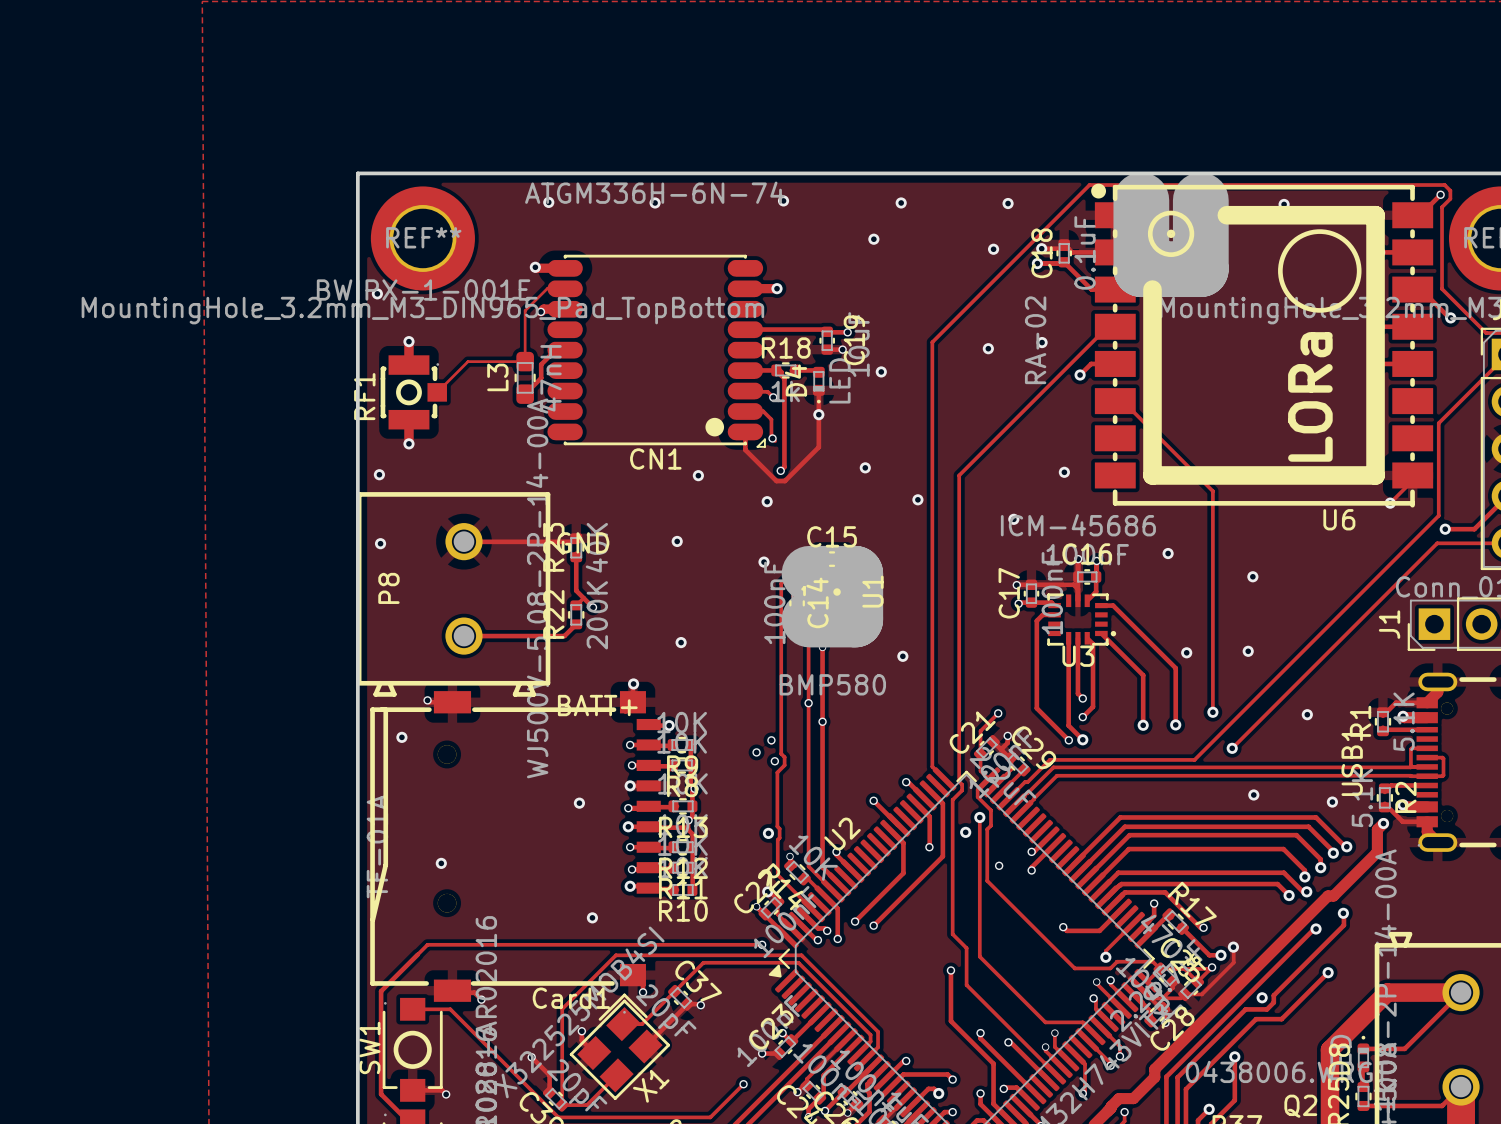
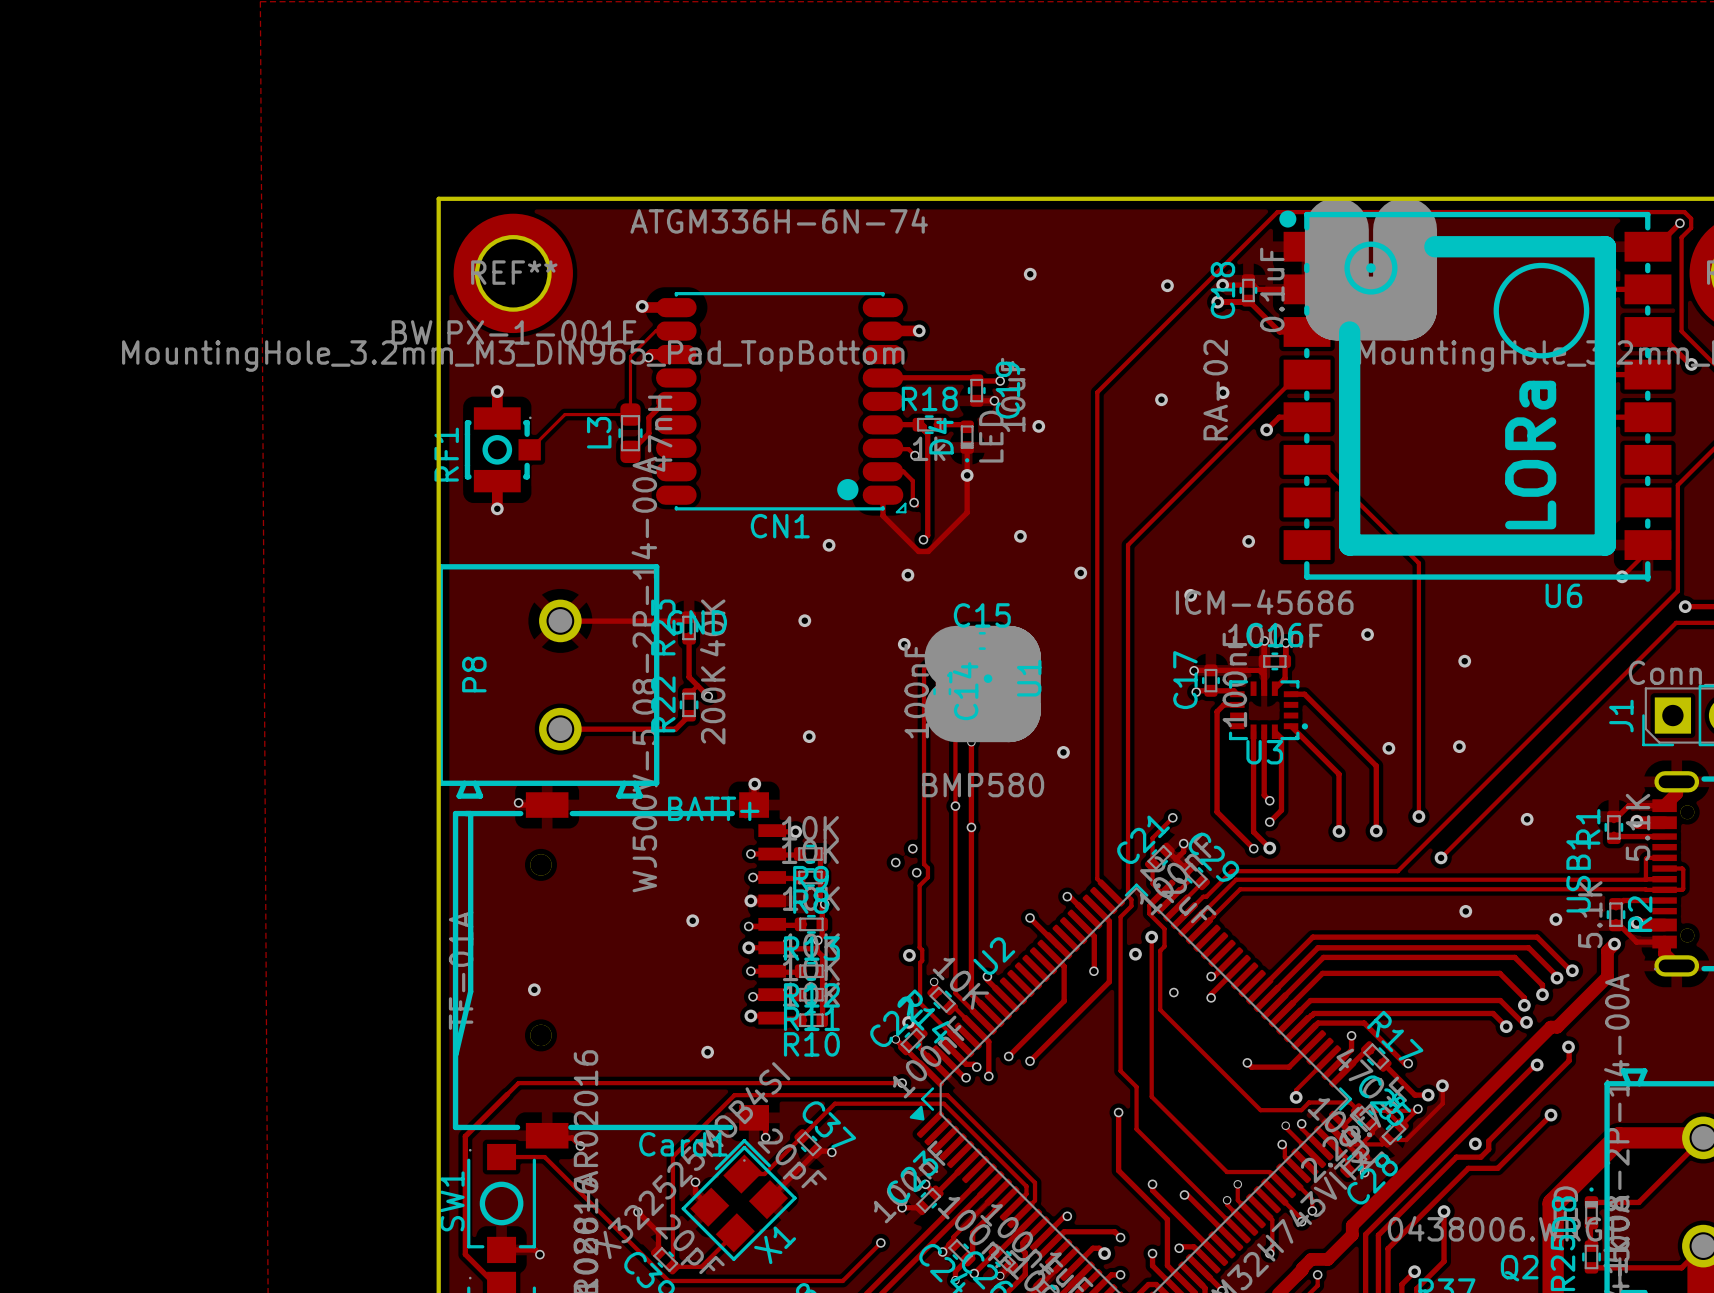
via: (783, 200) -> none
via: (548, 202) -> none
via: (655, 202) -> none
via: (901, 202) -> none
via: (1008, 203) -> none
via: (1284, 204) -> none
via: (377, 293) -> none
via: (379, 474) -> none
via: (380, 543) -> none
via: (401, 737) -> none

